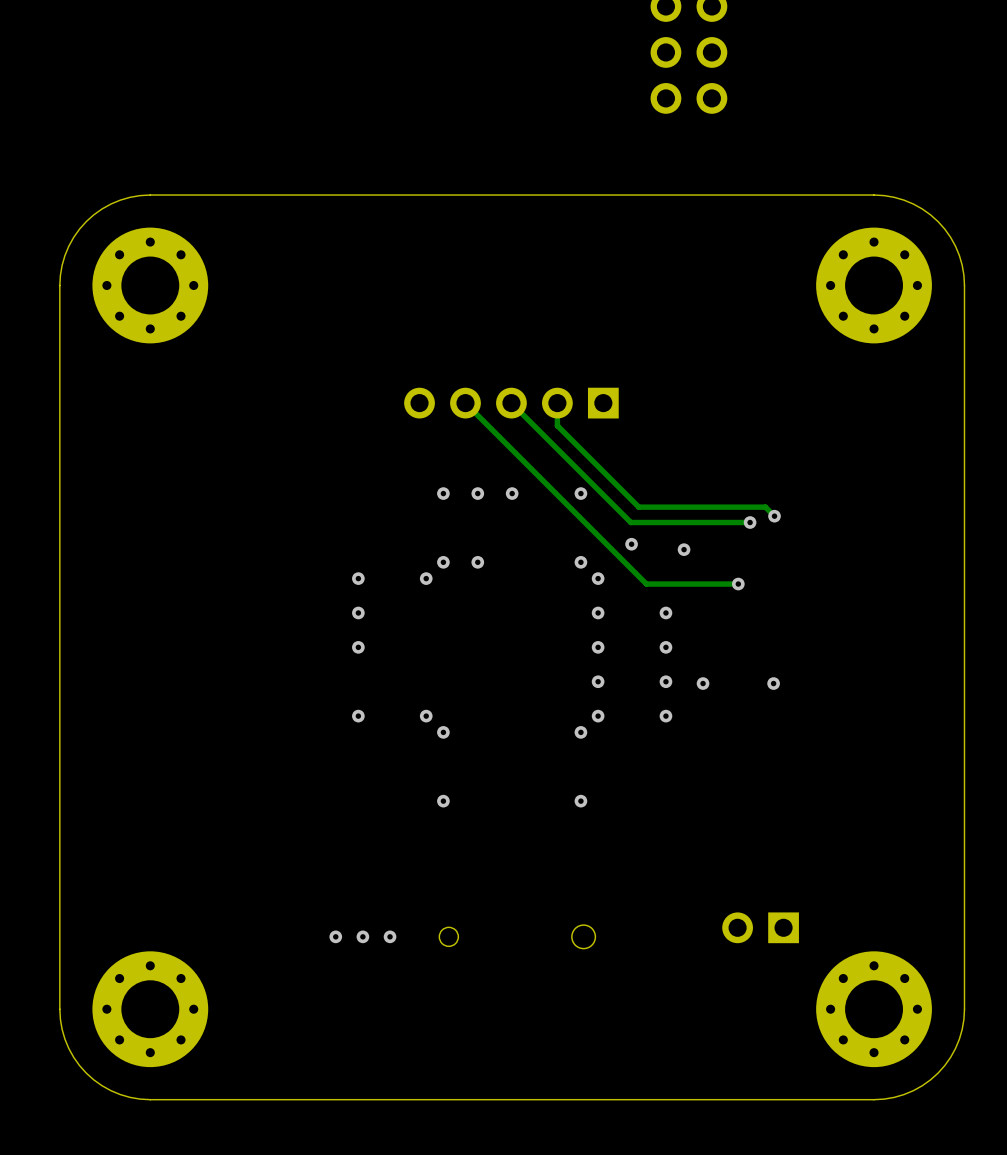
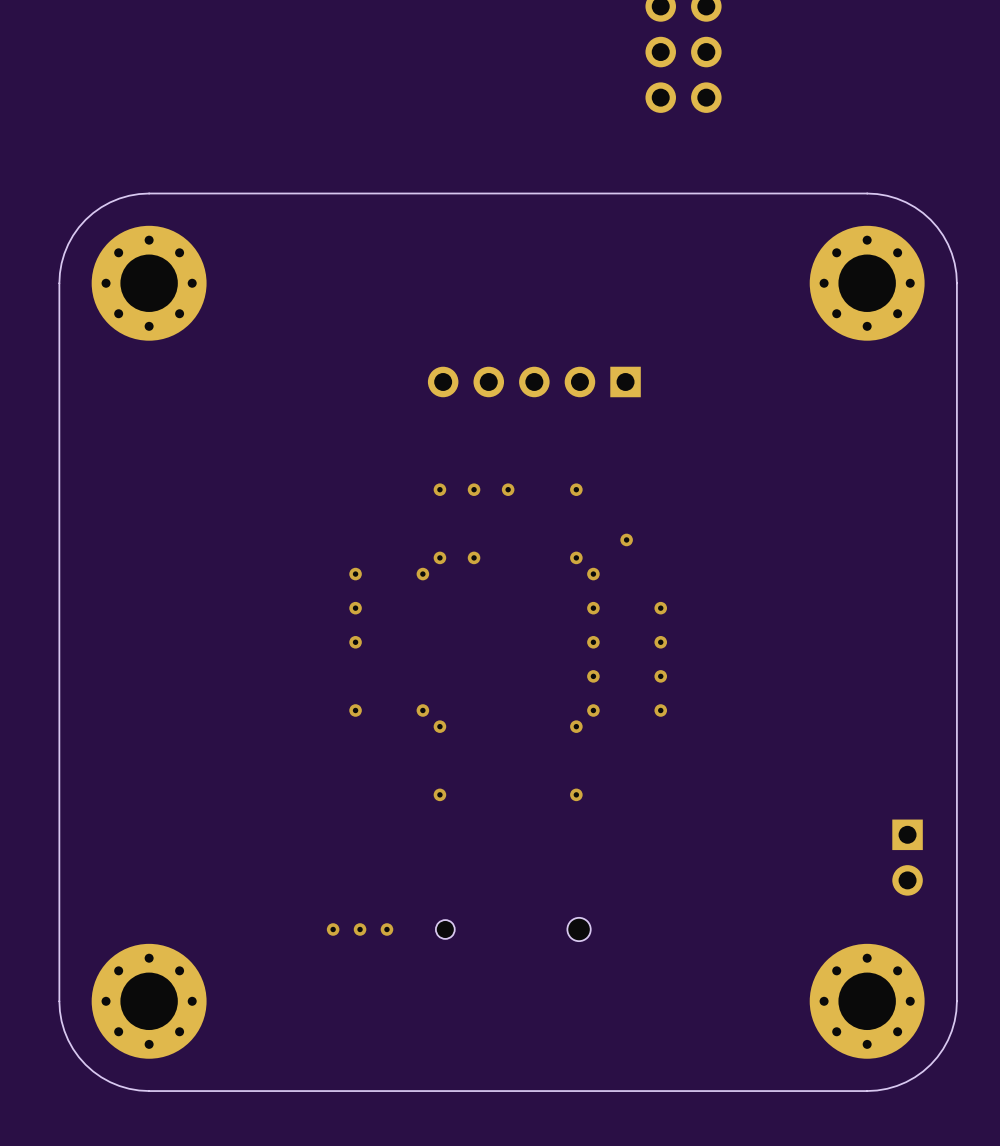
track: (465, 403) (646, 584) (738, 584) -> none
track: (511, 403) (630, 522) (750, 522) -> none
part position: (511, 403) -> (534, 381)
track: (557, 403) (557, 425) (638, 507) (765, 507) (774, 516) -> none
via: (774, 516) -> none
via: (750, 522) -> none
via: (684, 549) -> none
via: (738, 584) -> none
via: (703, 683) -> none
via: (773, 683) -> none
part rotation: 0° (760, 927) -> 90° counterclockwise (907, 857)
part position: (760, 927) -> (907, 857)

